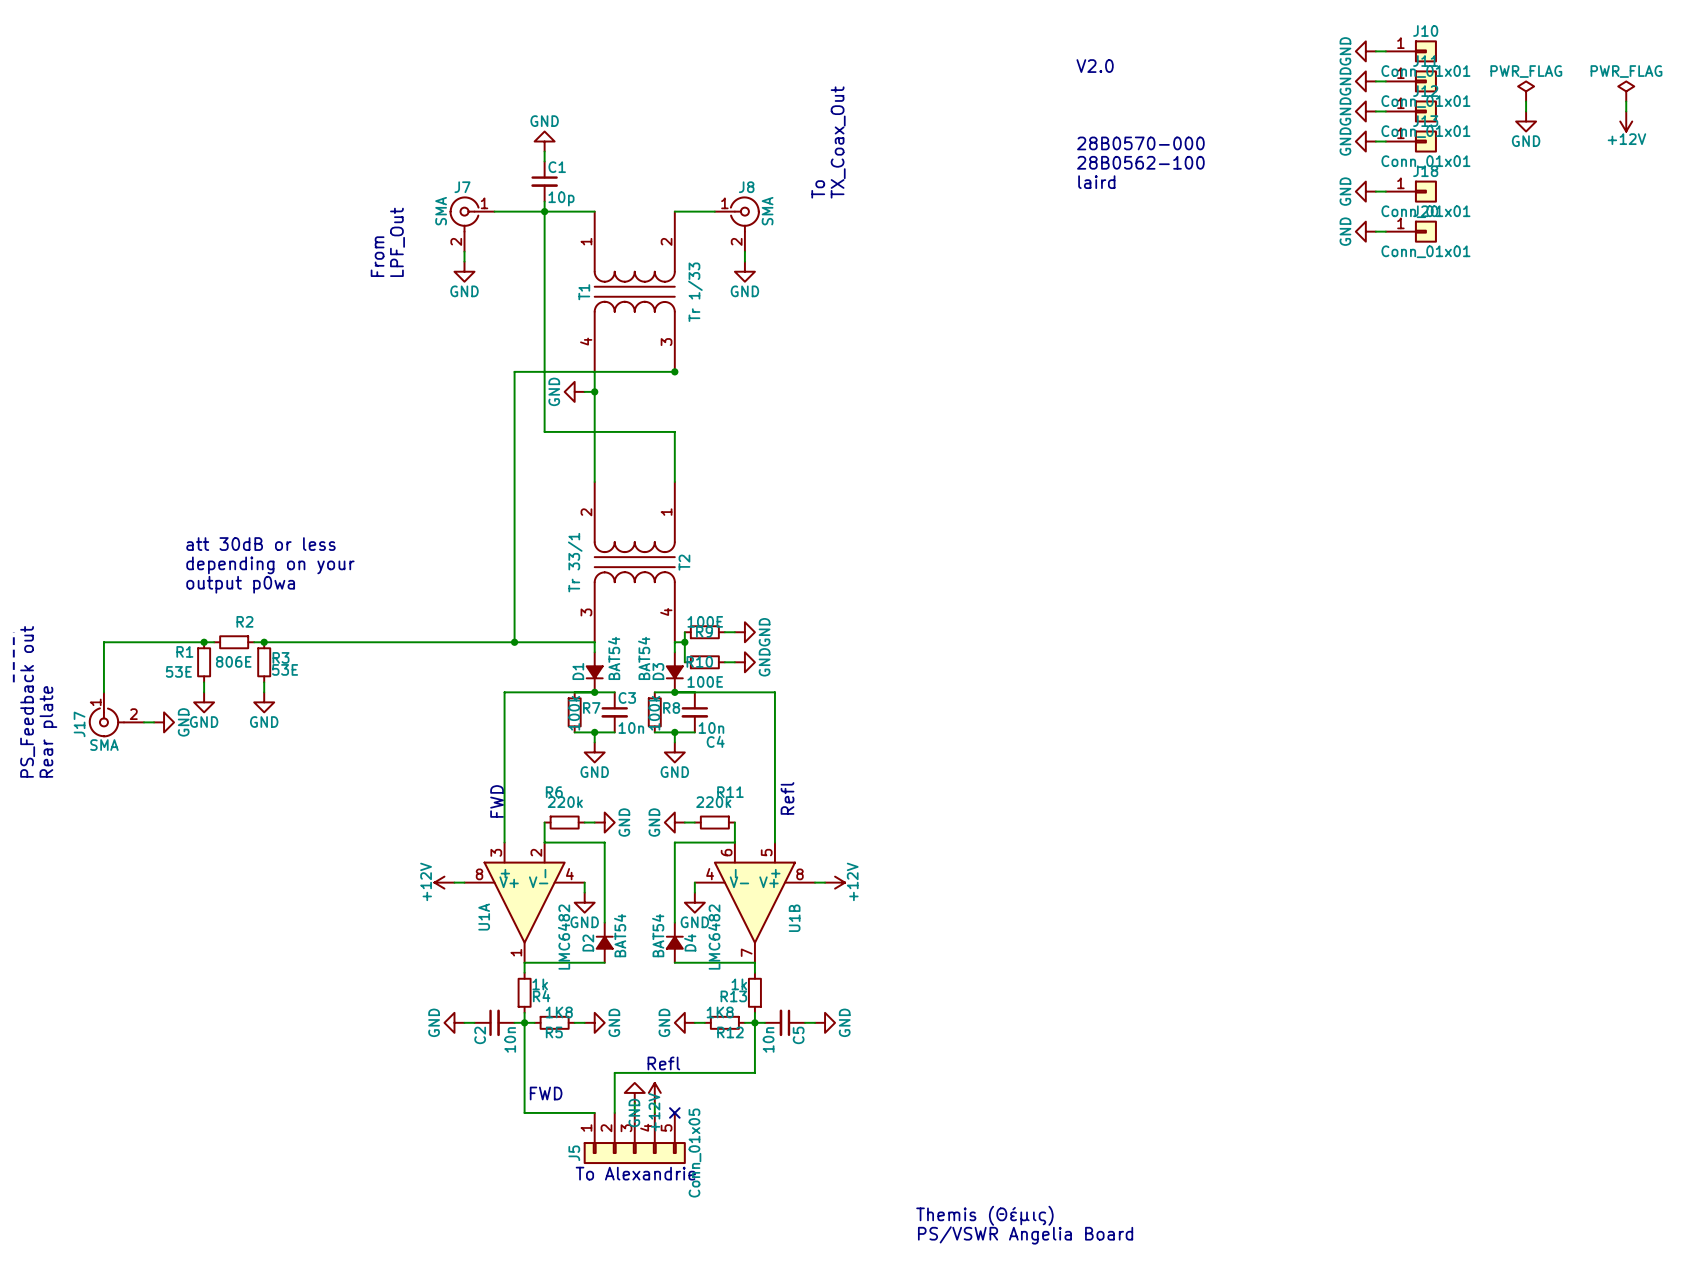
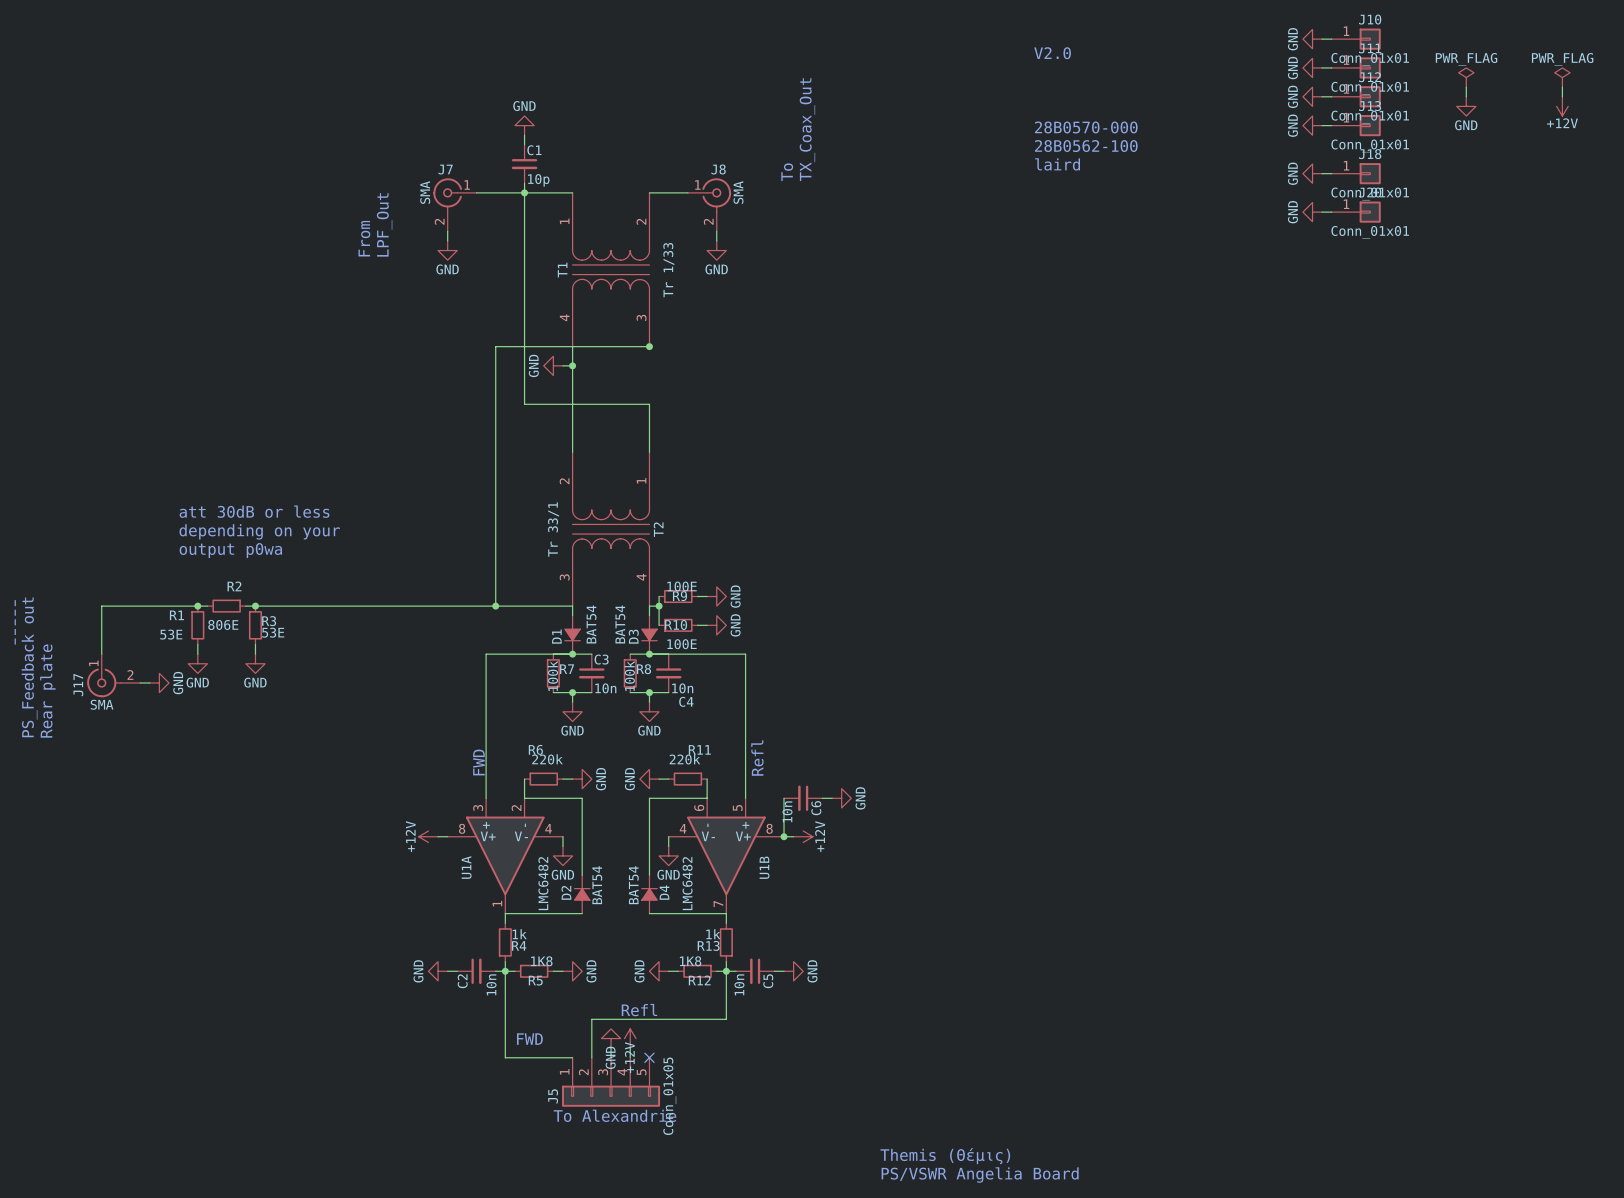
wire: none -> (784, 798) (784, 836)
C6: none -> 10n (803, 798)
wire: none -> (822, 798) (832, 798)
power symbol: none -> GND (841, 798)
junction: none -> (784, 836)

